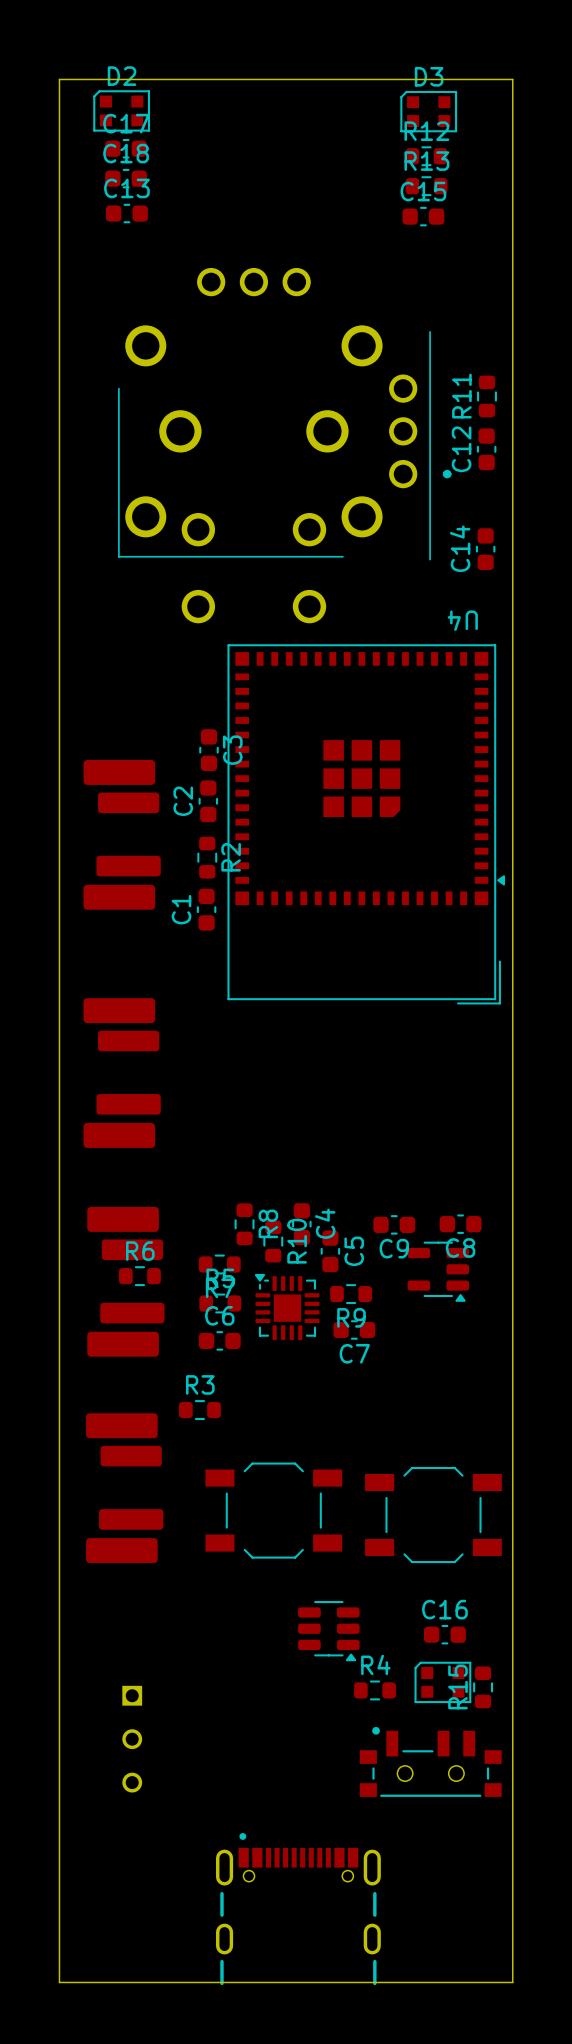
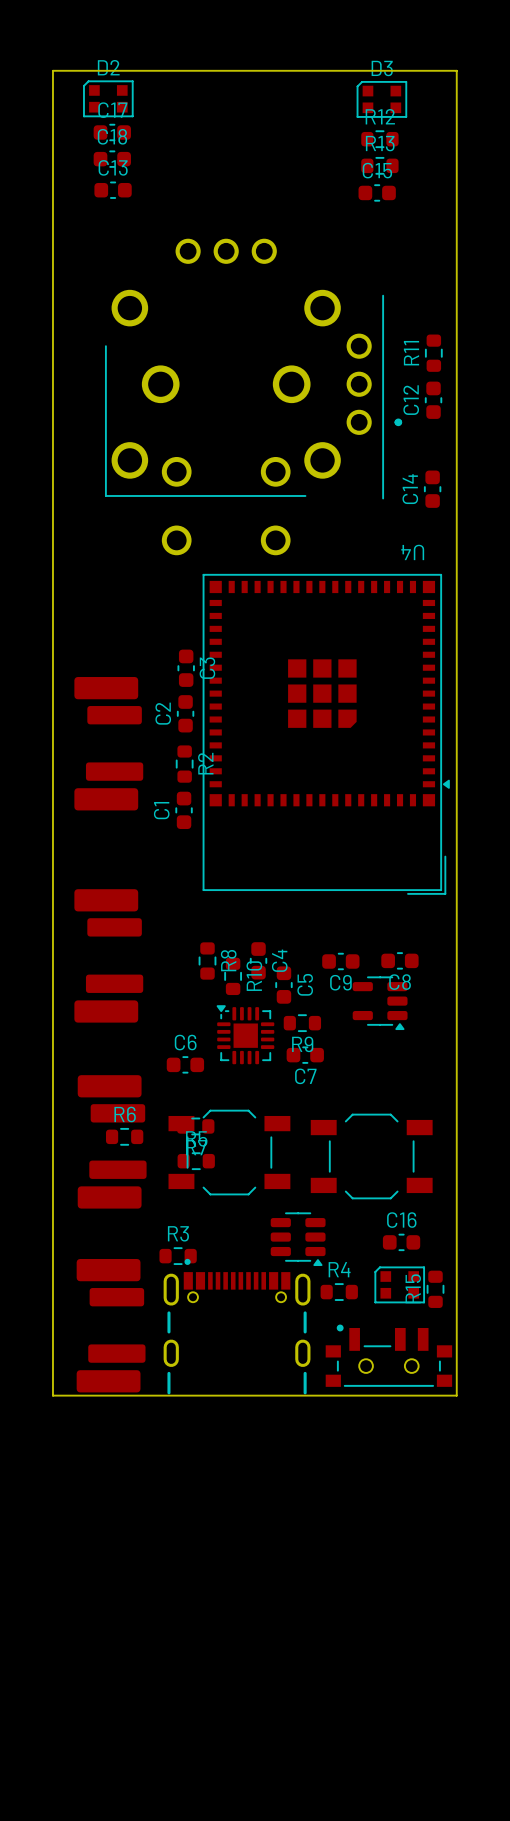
R8 position: (244, 1224) -> (207, 961)
C4 position: (301, 1224) -> (258, 960)
C9 position: (394, 1224) -> (340, 961)
C8 position: (460, 1224) -> (399, 960)
R10 position: (273, 1241) -> (233, 976)
C5 position: (330, 1251) -> (283, 985)
part position: (438, 1271) -> (380, 1003)
part: none -> (229, 1152)
R9 position: (351, 1294) -> (302, 1023)
part: none -> (371, 1156)
part position: (287, 1307) -> (245, 1034)
C7 position: (354, 1329) -> (305, 1055)
C6 position: (219, 1340) -> (185, 1064)
part footprint: [365, 1466, 502, 1564] -> [325, 1324, 453, 1387]
part: (273, 1510) -> none
board edge: (59, 1566) (59, 1982) (512, 1982) (512, 1566) -> (52, 1395) (456, 1395)
part position: (328, 1631) -> (298, 1239)
C16 position: (444, 1634) -> (401, 1242)
part position: (442, 1682) -> (399, 1284)
R15 position: (483, 1687) -> (435, 1289)
R4 position: (375, 1690) -> (339, 1292)
part: (132, 1739) -> none
part: (430, 1761) -> none
part position: (298, 1909) -> (237, 1326)

